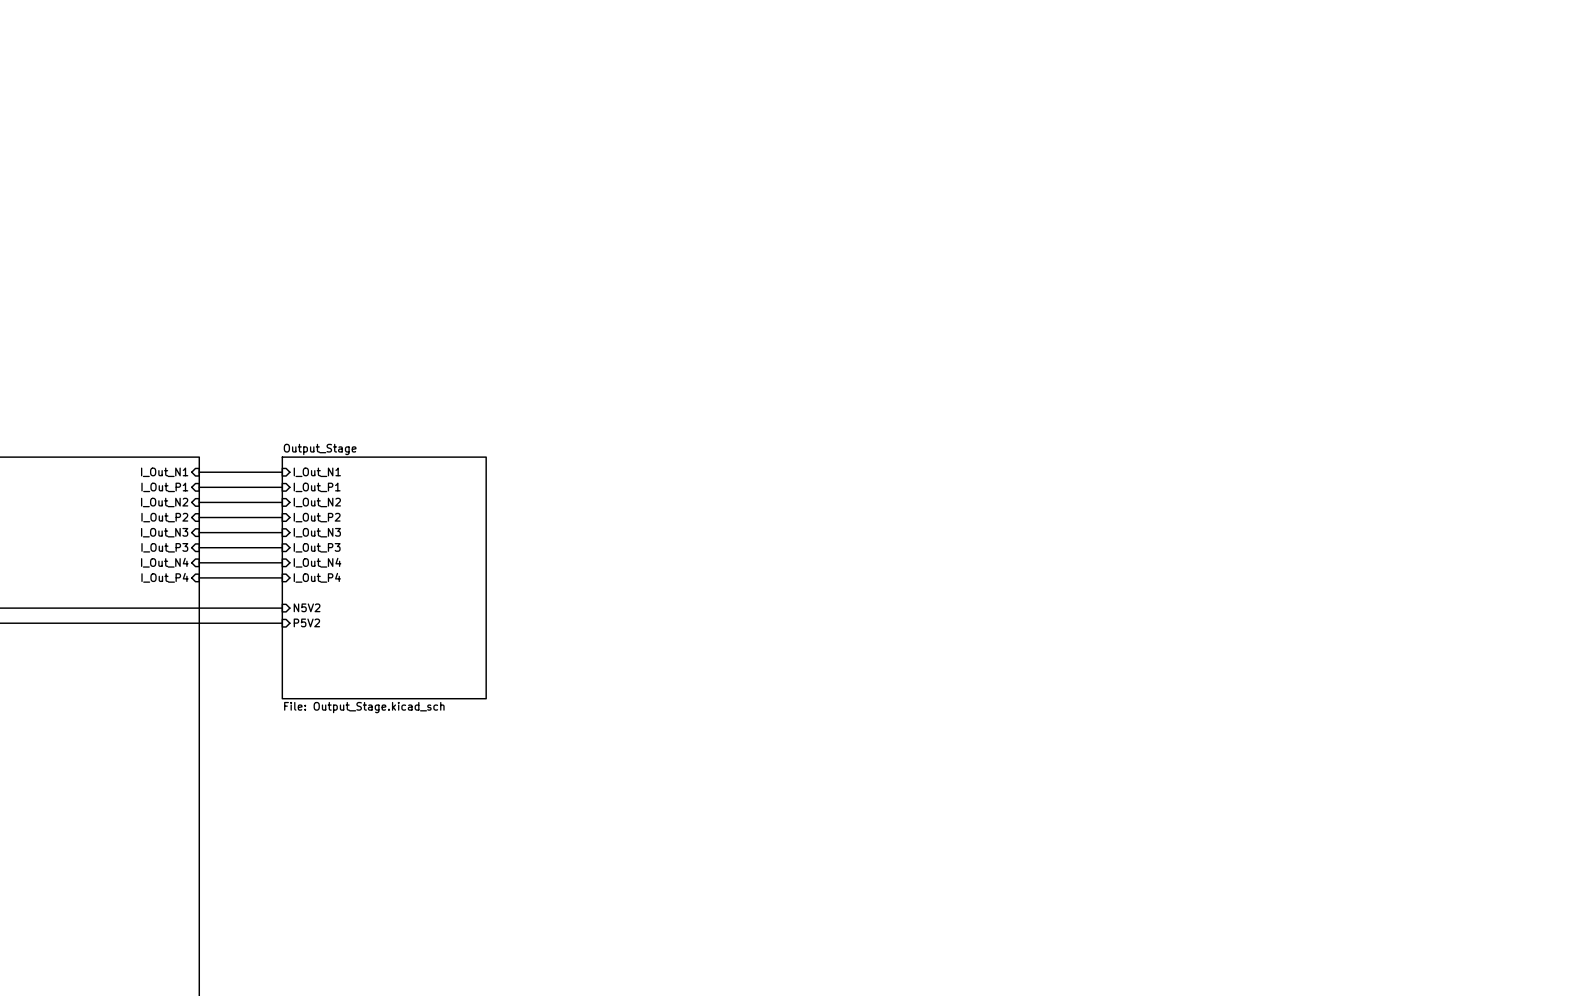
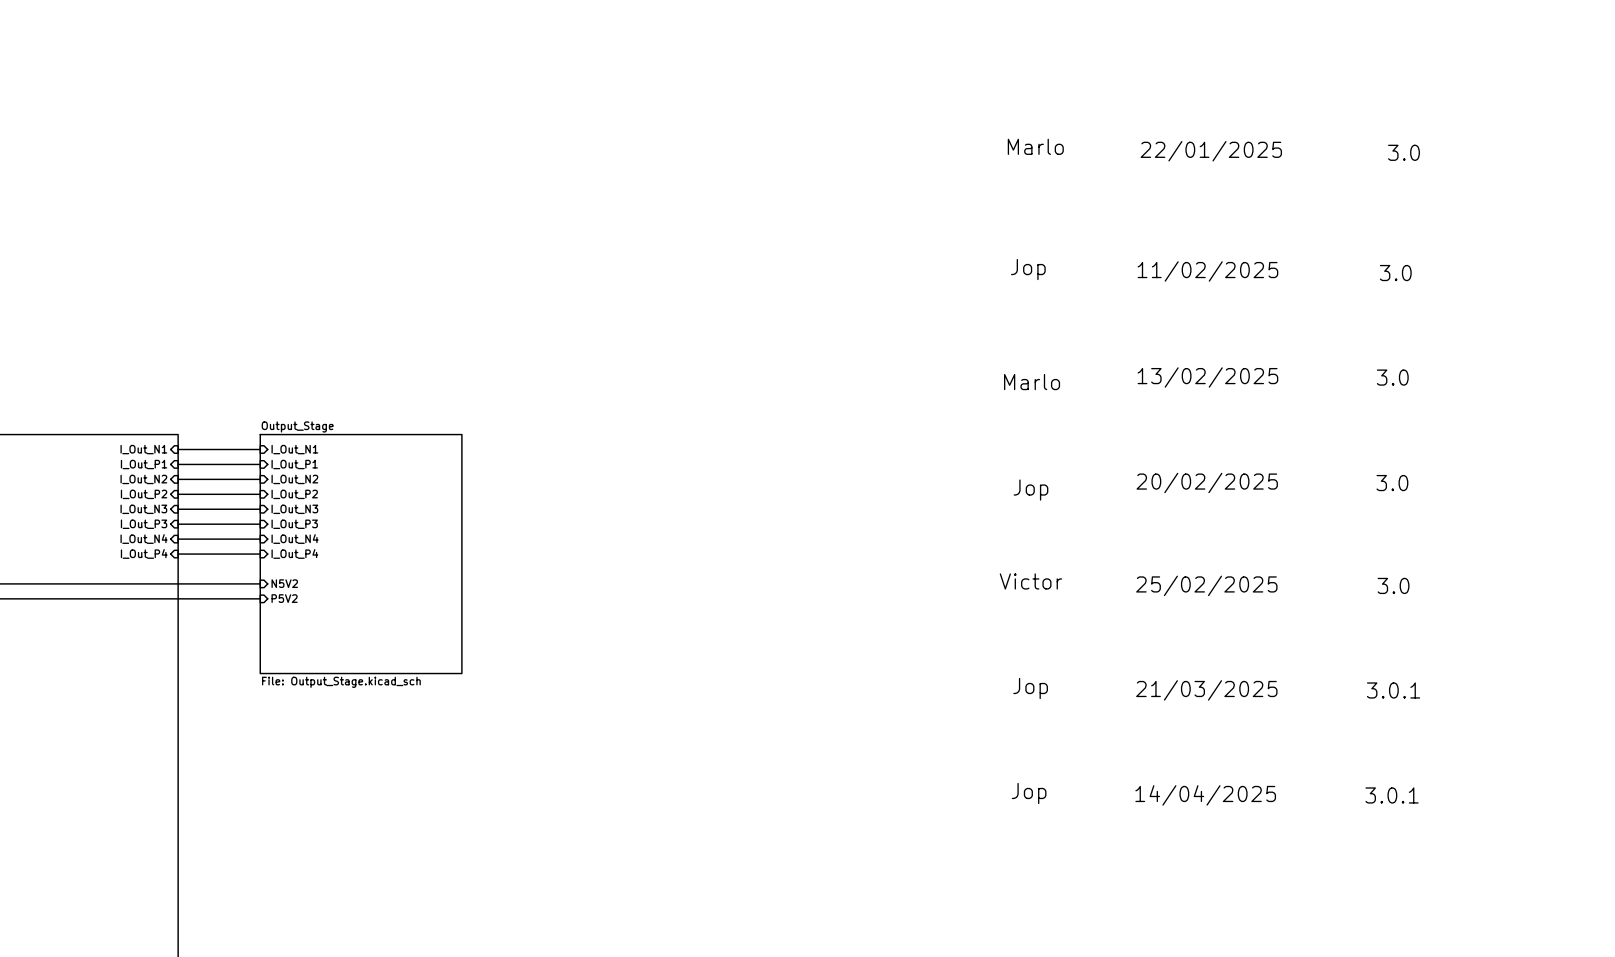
text: none -> Marlo (1035, 146)
text: none -> 22/01/2025 (1211, 151)
text: none -> 3.0 (1403, 152)
text: none -> Jop (1028, 269)
text: none -> 11/02/2025 (1207, 271)
text: none -> 3.0 (1395, 273)
text: none -> 13/02/2025 (1207, 377)
text: none -> 3.0 (1392, 377)
text: none -> Marlo (1032, 382)
text: none -> 20/02/2025 (1207, 482)
text: none -> 3.0 (1392, 483)
text: none -> Jop (1030, 490)
text: none -> Victor (1030, 581)
text: none -> 25/02/2025 (1206, 585)
text: none -> 3.0 (1393, 585)
text: none -> Jop (1030, 688)
text: none -> 21/03/2025 (1206, 690)
text: none -> 3.0.1 (1393, 690)
text: none -> Jop (1029, 793)
text: none -> 14/04/2025 (1205, 795)
text: none -> 3.0.1 (1392, 795)

